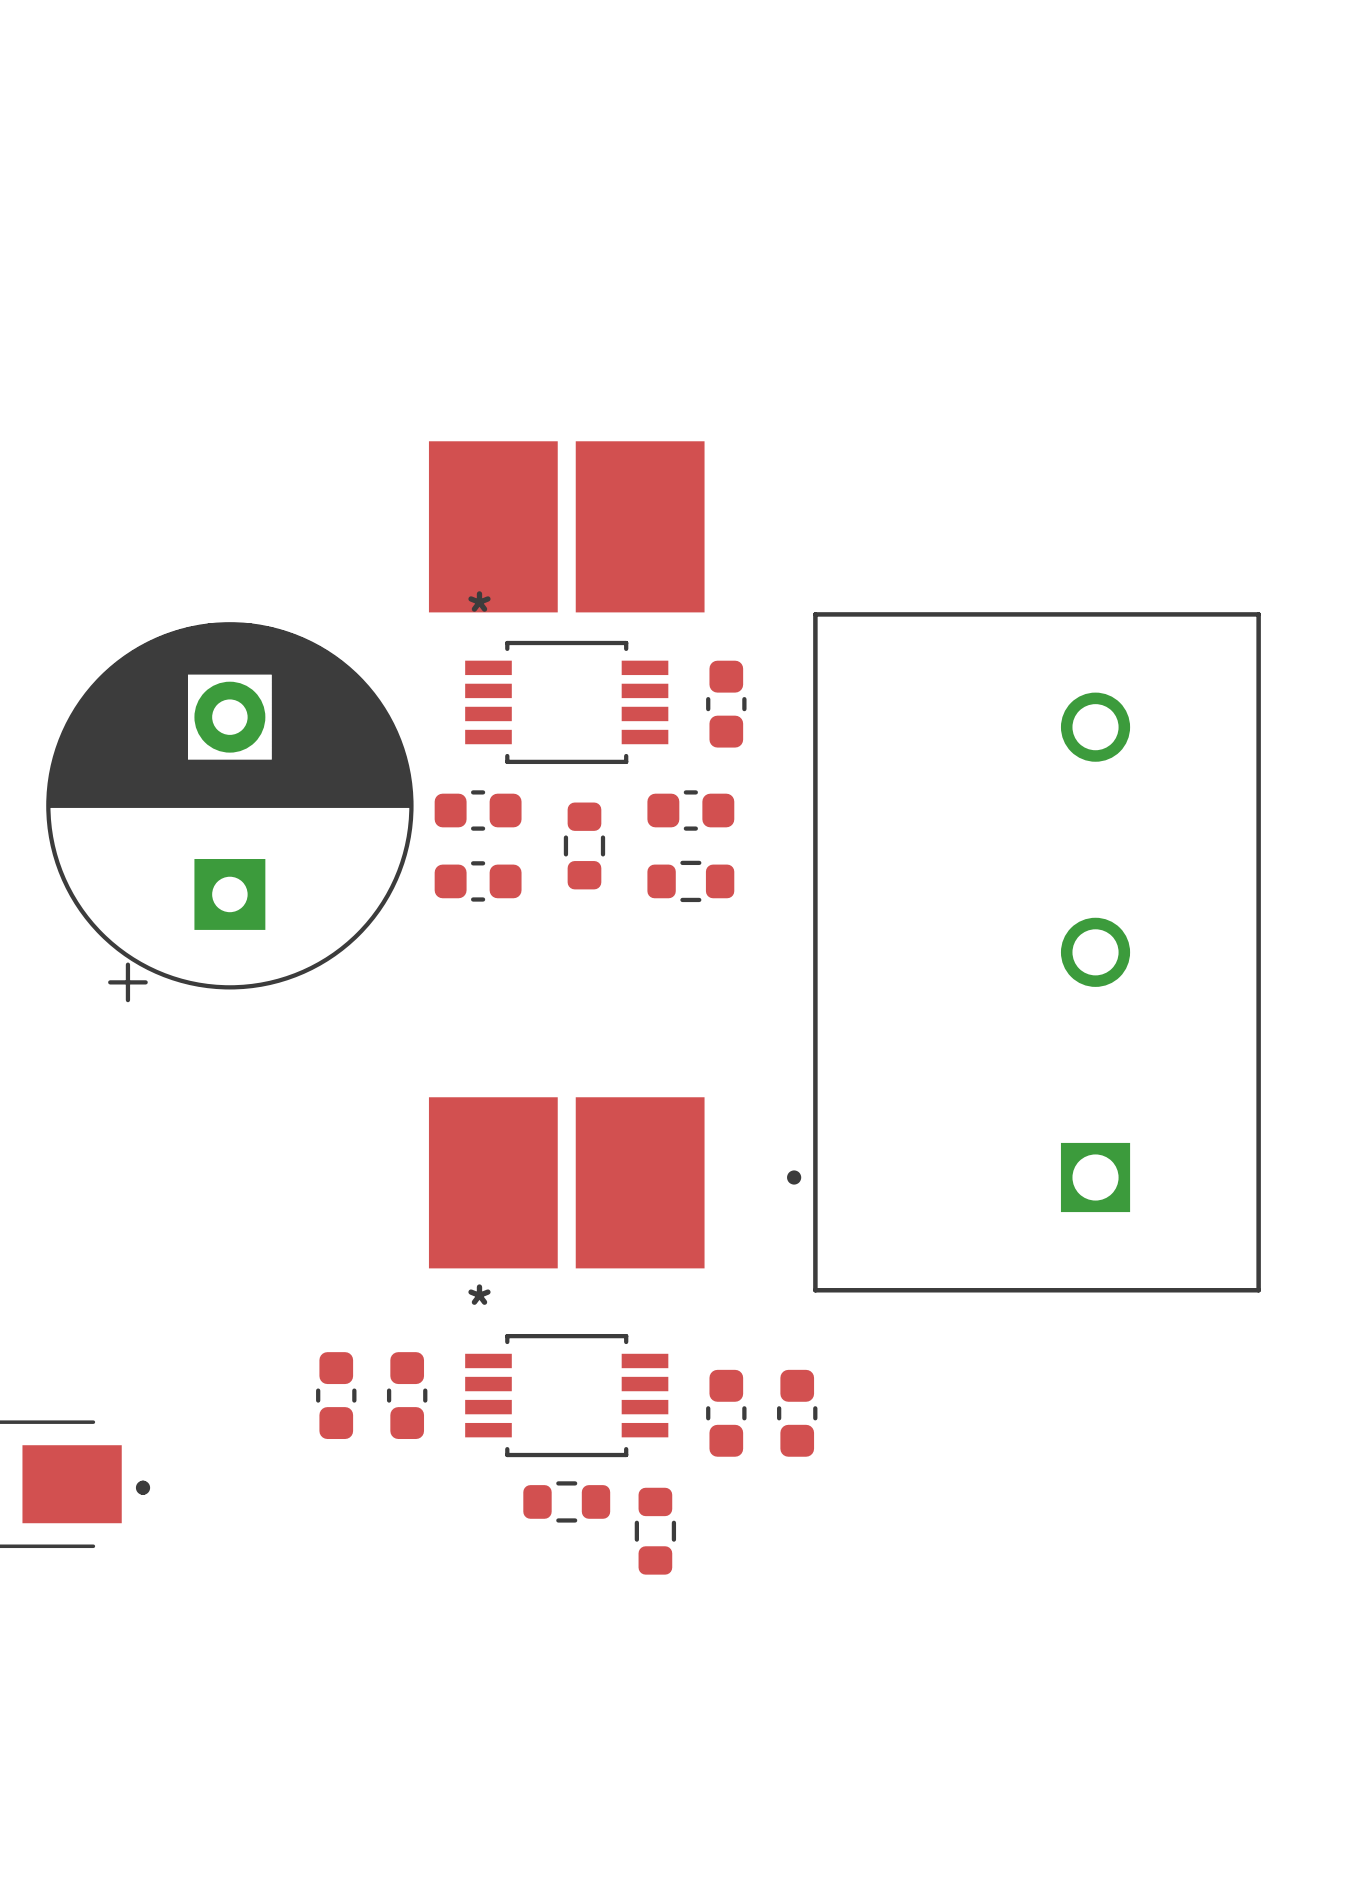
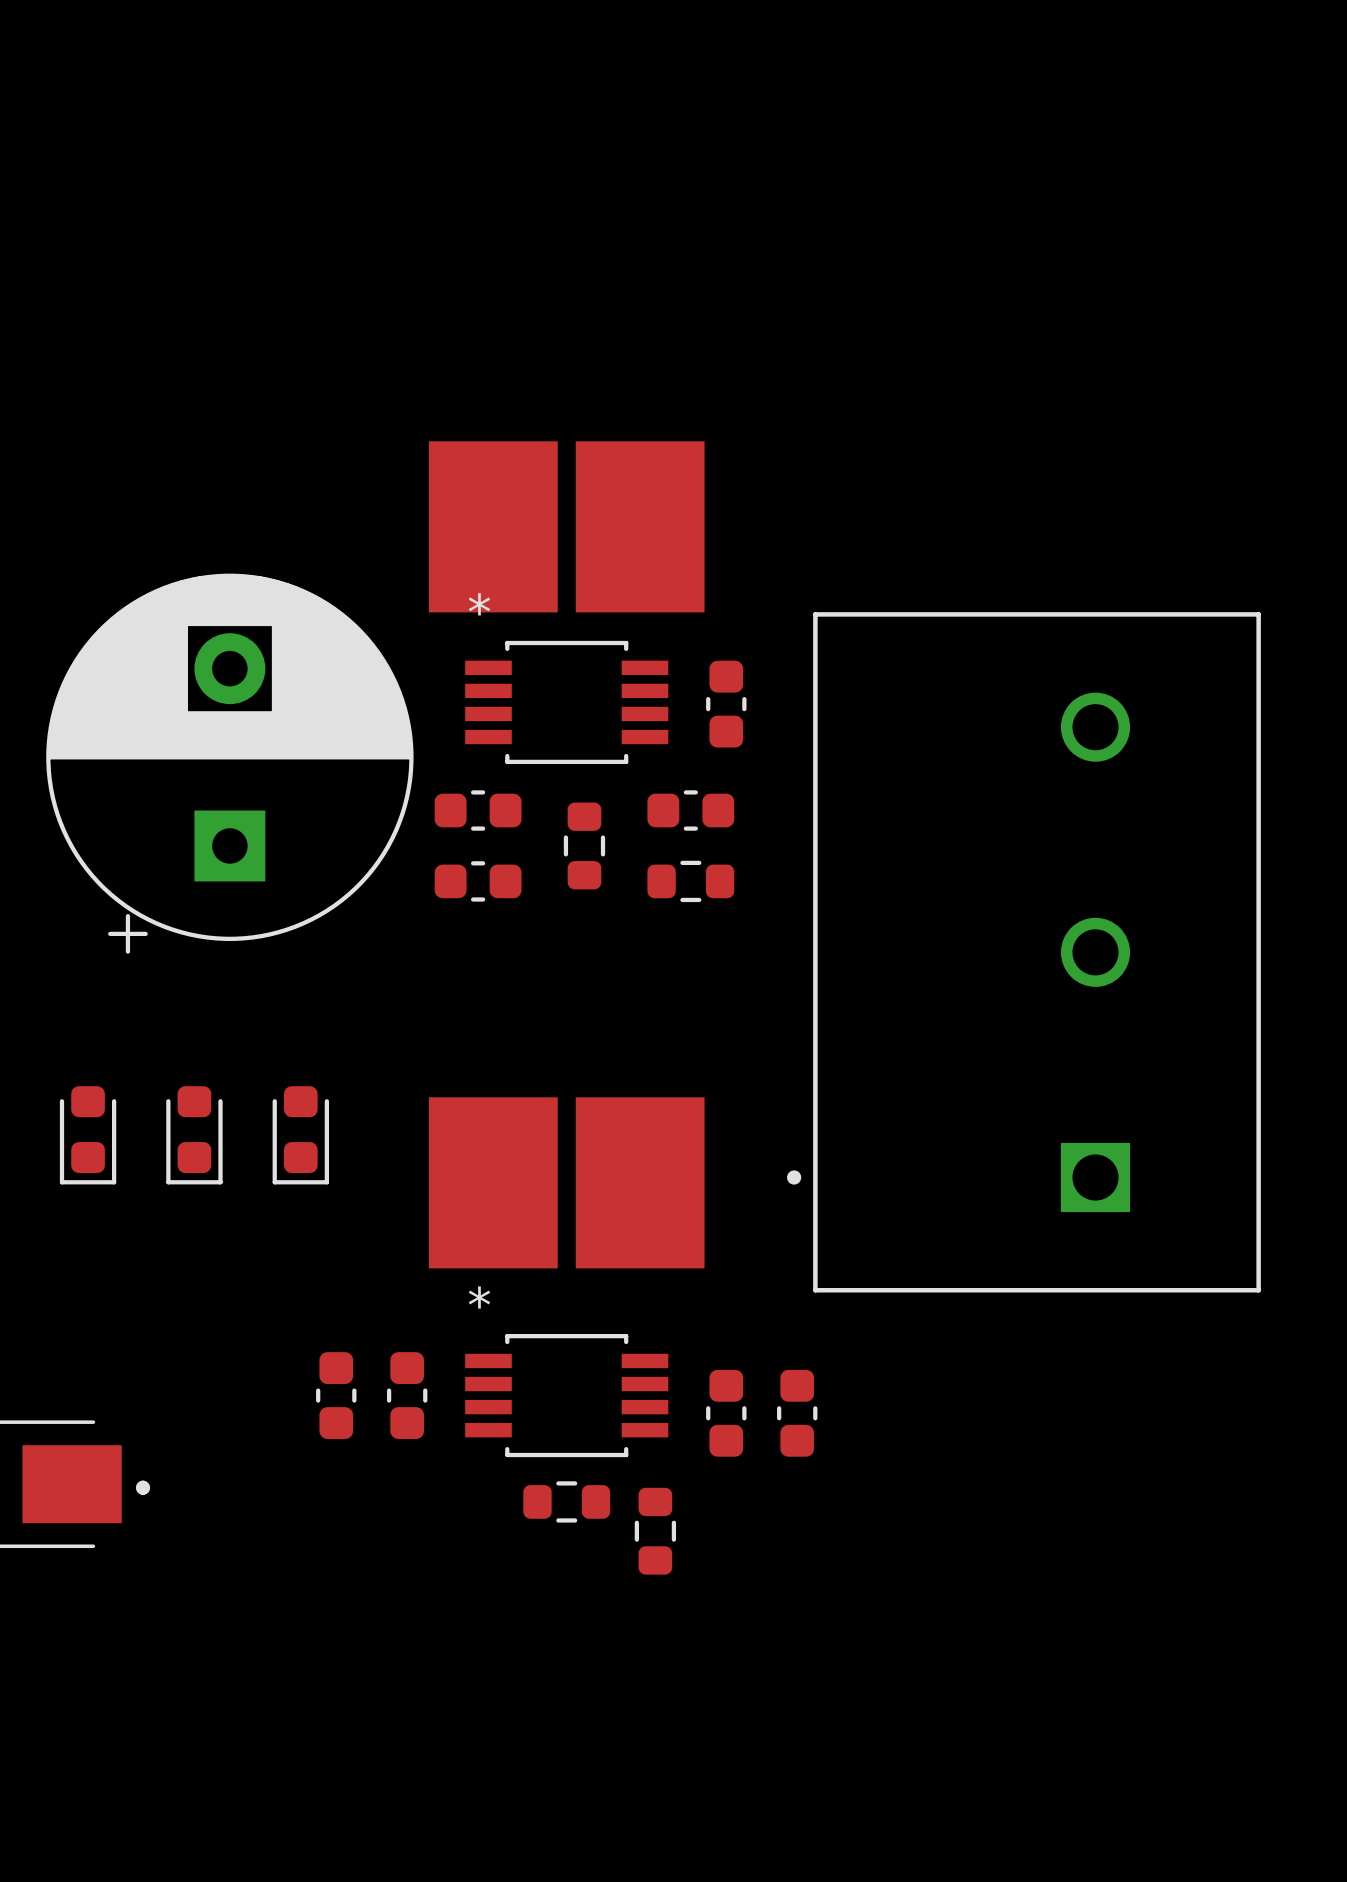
part position: (229, 812) -> (229, 763)
part: none -> (88, 1135)
part: none -> (194, 1135)
part: none -> (300, 1135)

